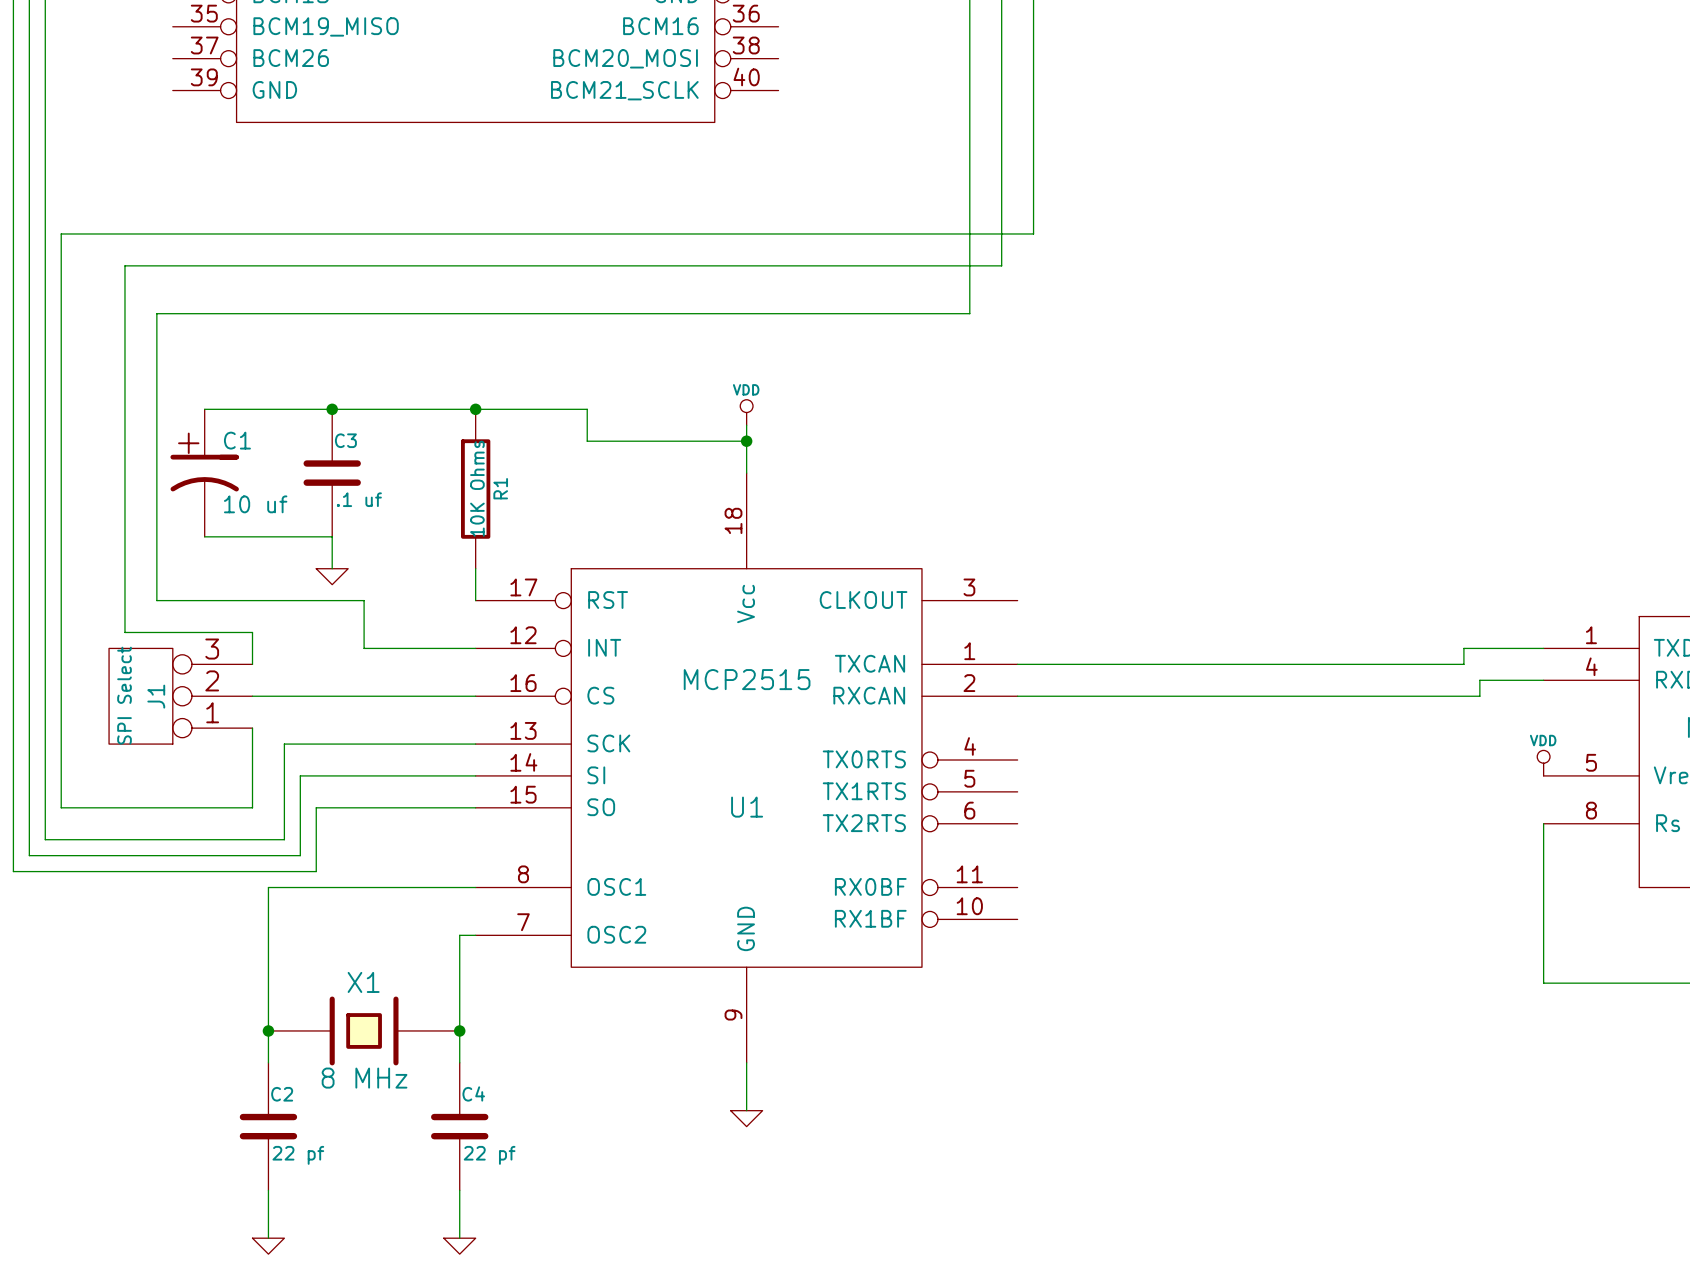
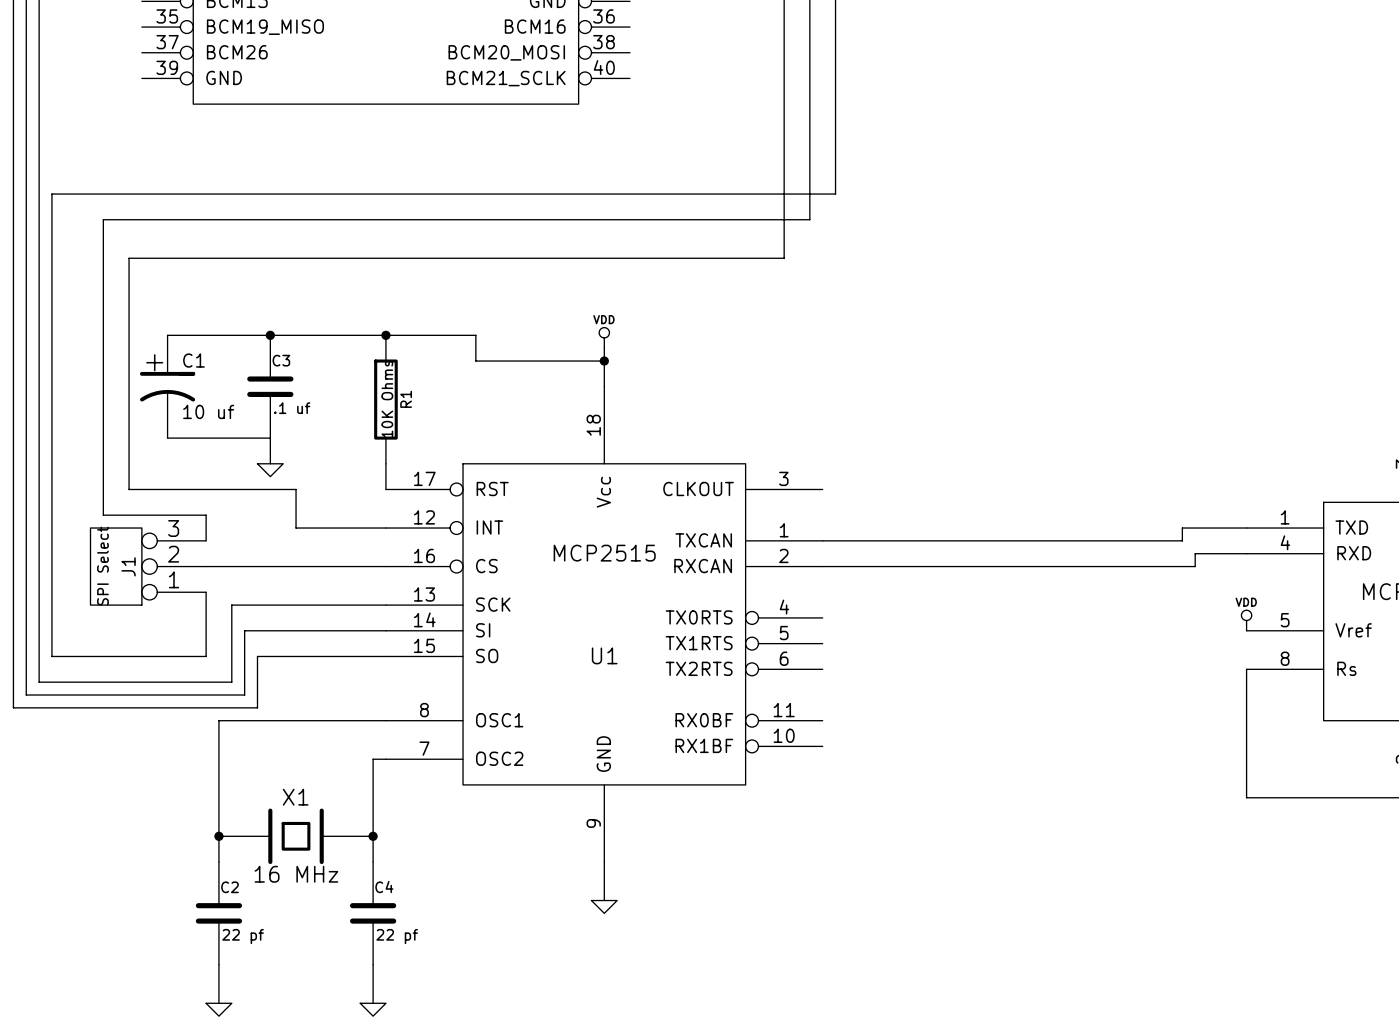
X1 value: 8 MHz (364, 1078) -> 16 MHz (296, 874)

